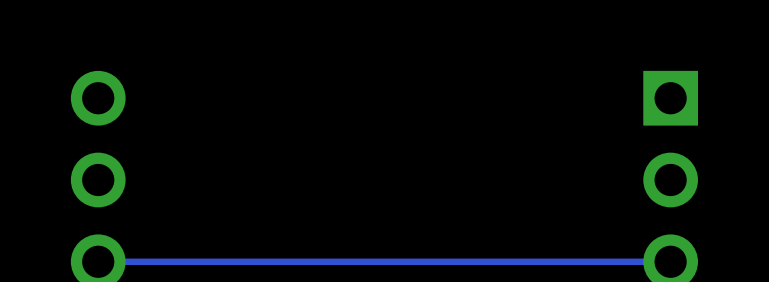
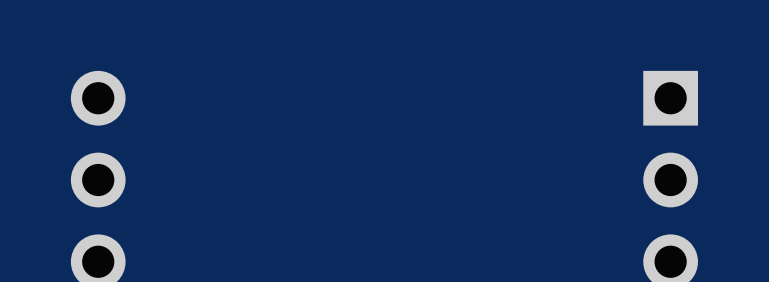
track: (670, 261) (98, 261) -> none

